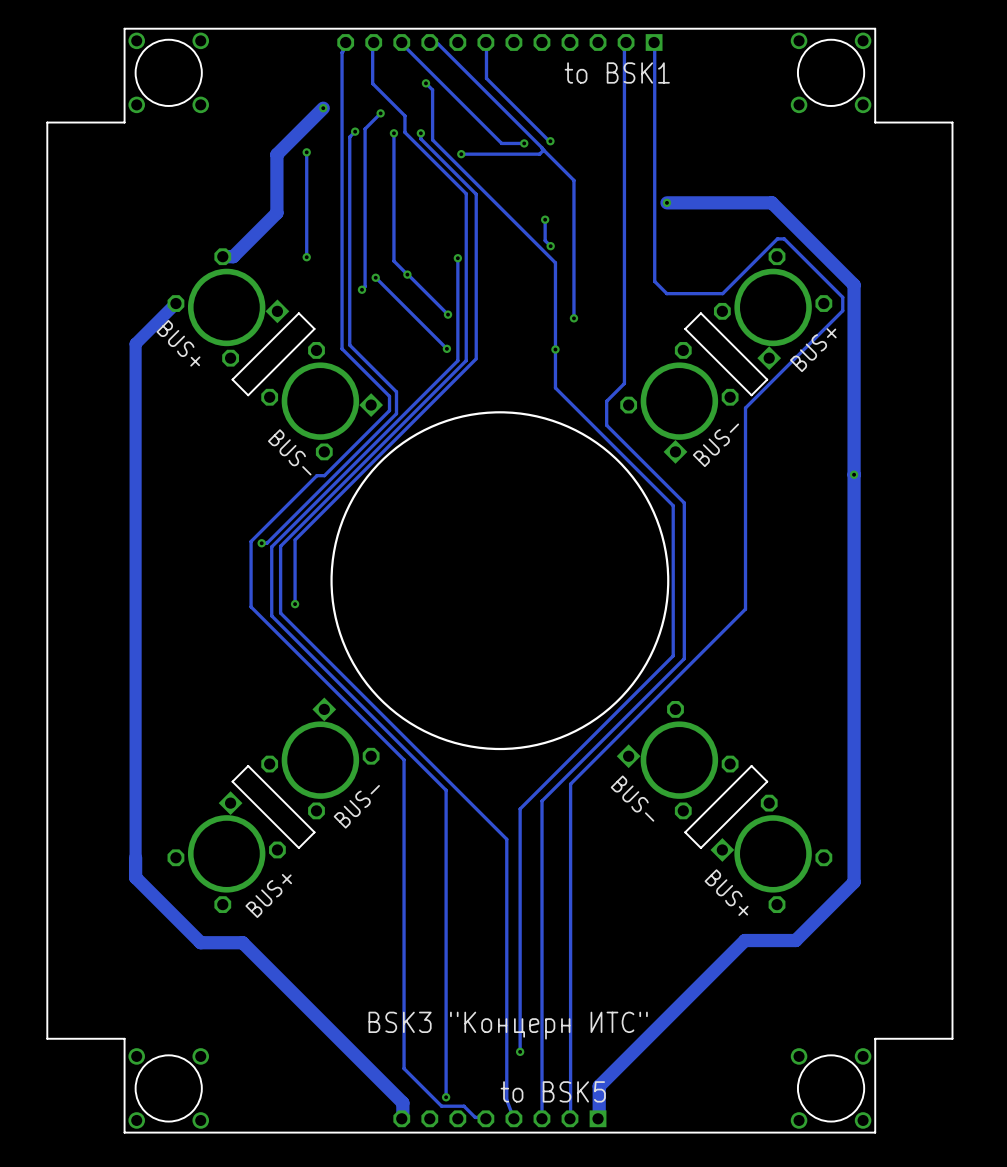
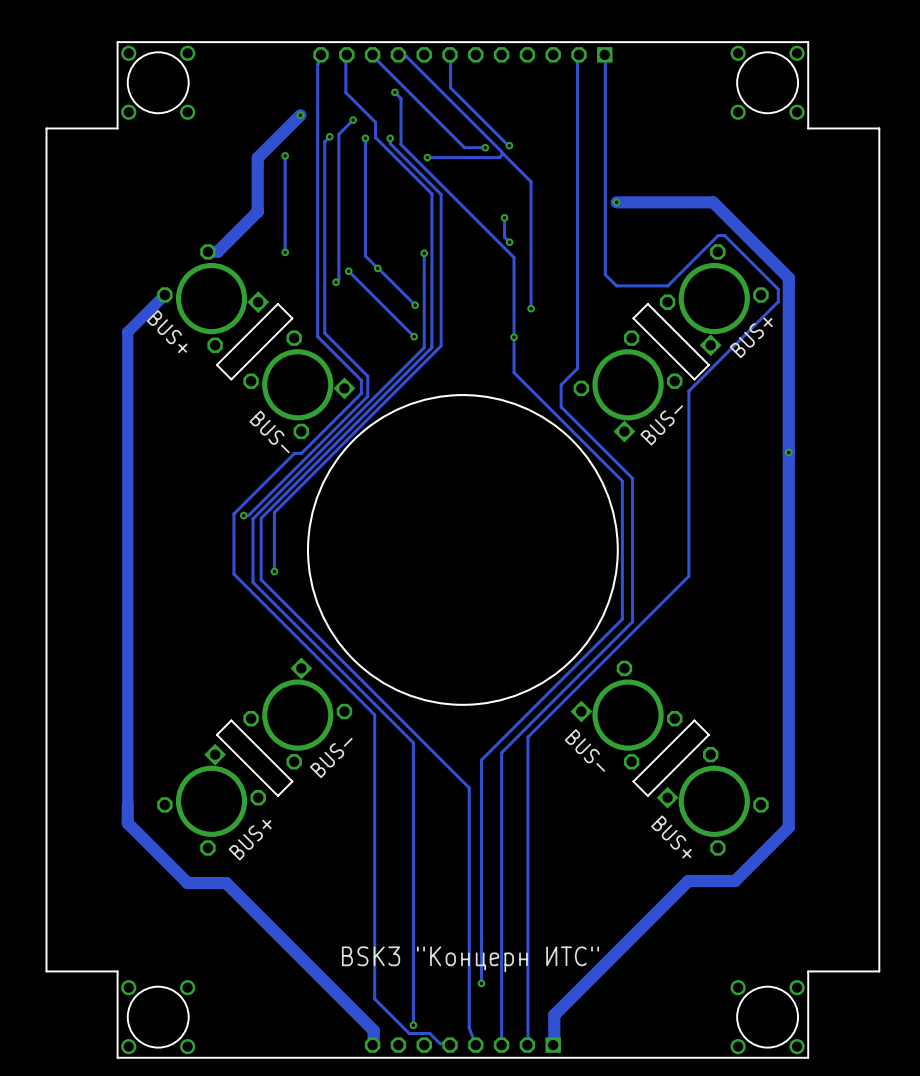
text: to BSK1 (617, 72) -> none
text: to BSK5 (553, 1091) -> none

